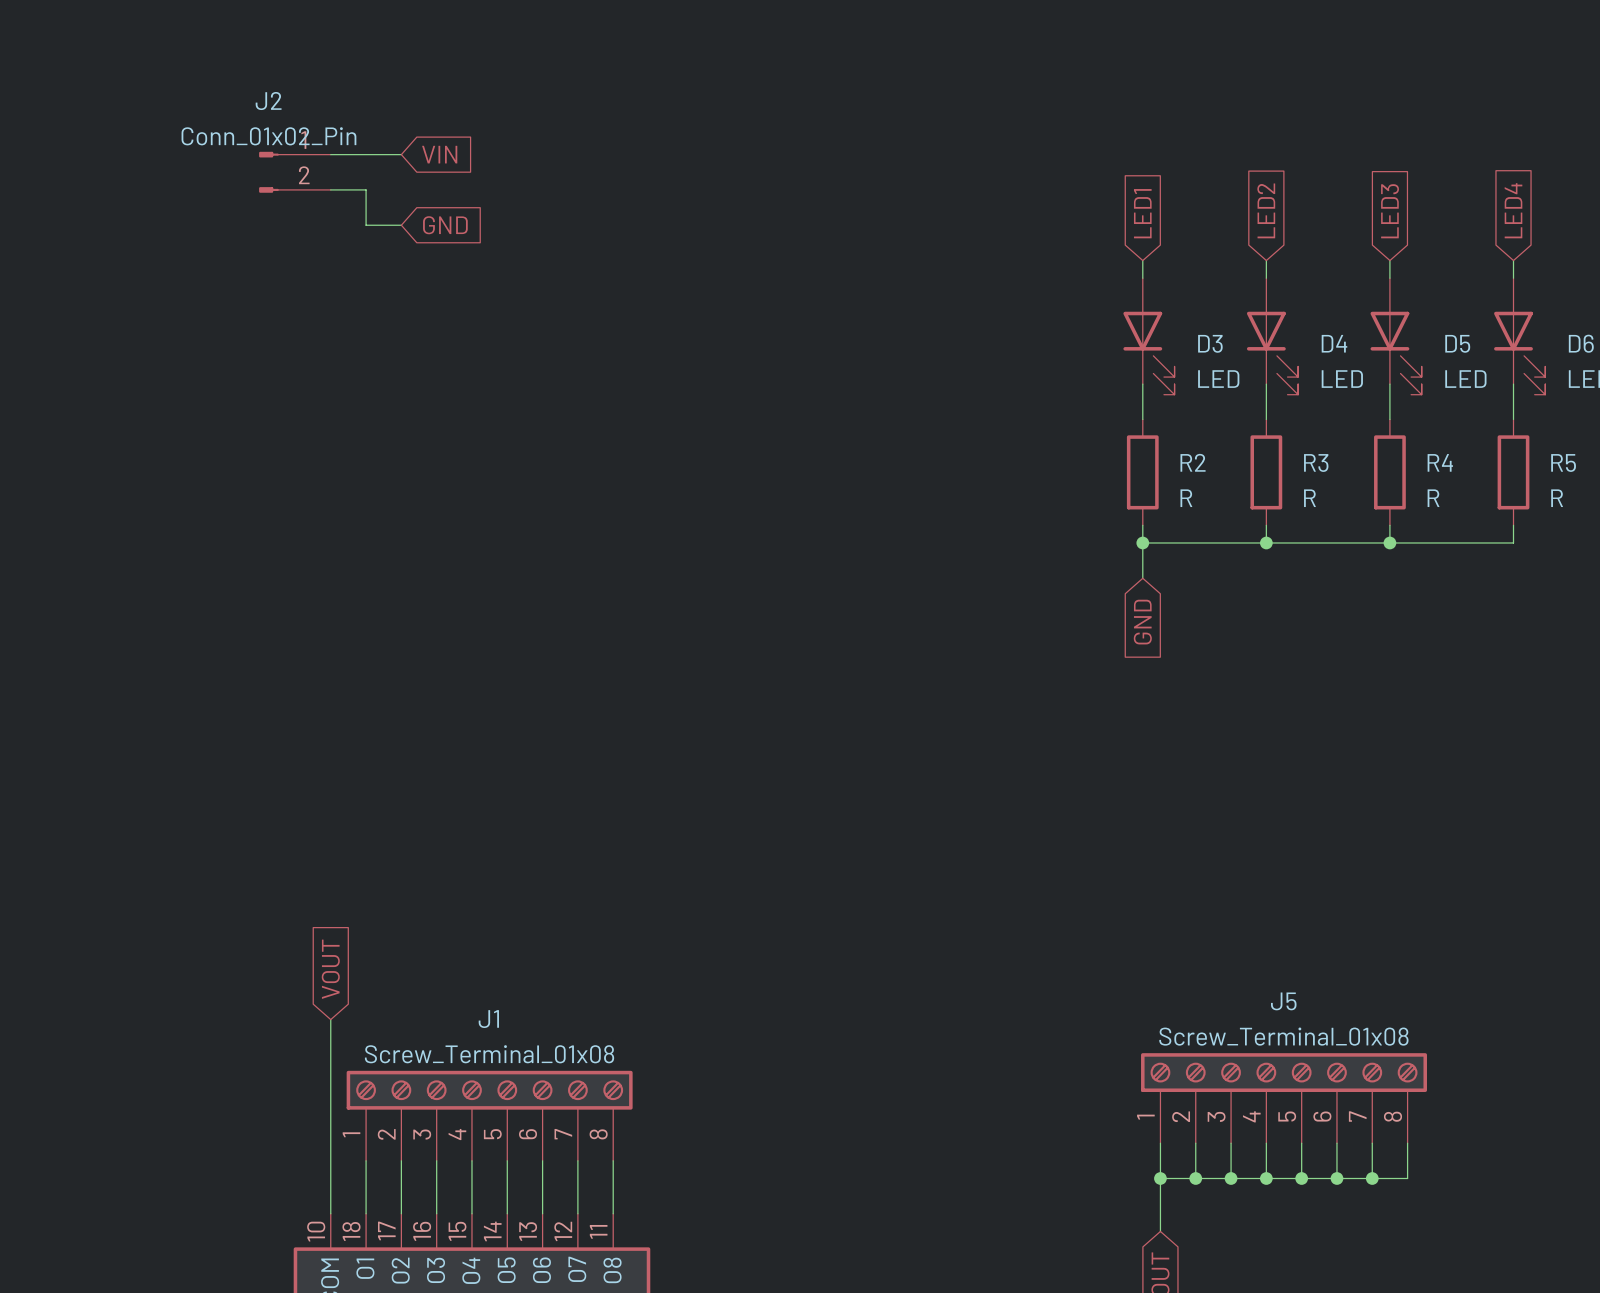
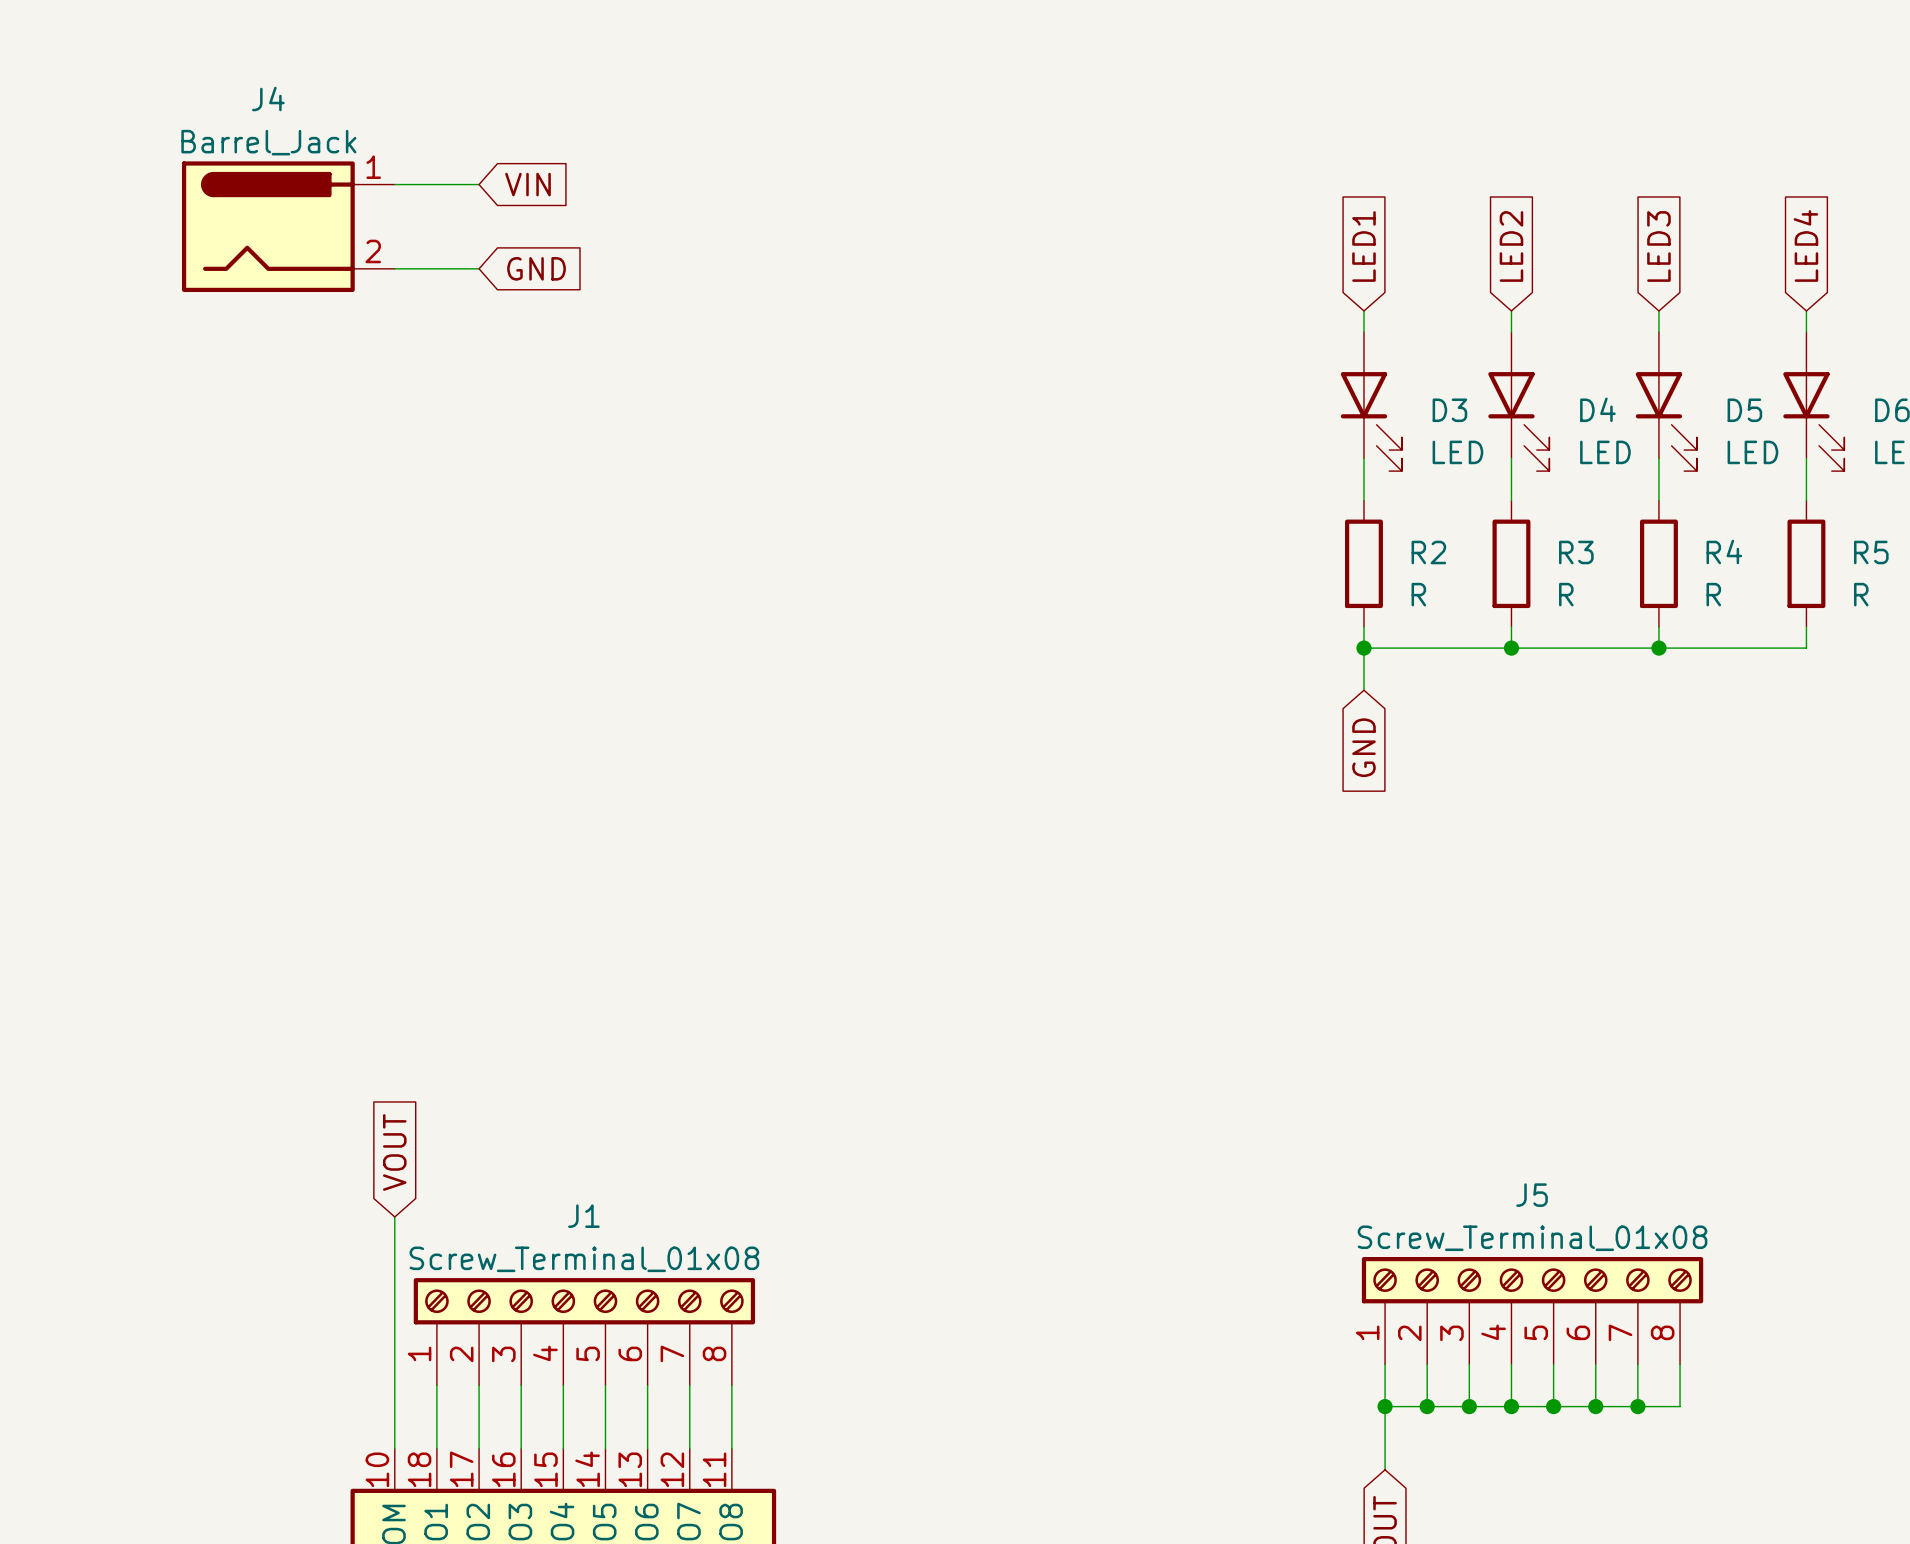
J2: Conn_01x02_Pin (294, 172) -> none
J4: none -> Barrel_Jack (288, 226)
wire: (330, 189) (366, 189) (366, 225) -> (394, 268) (436, 268)

